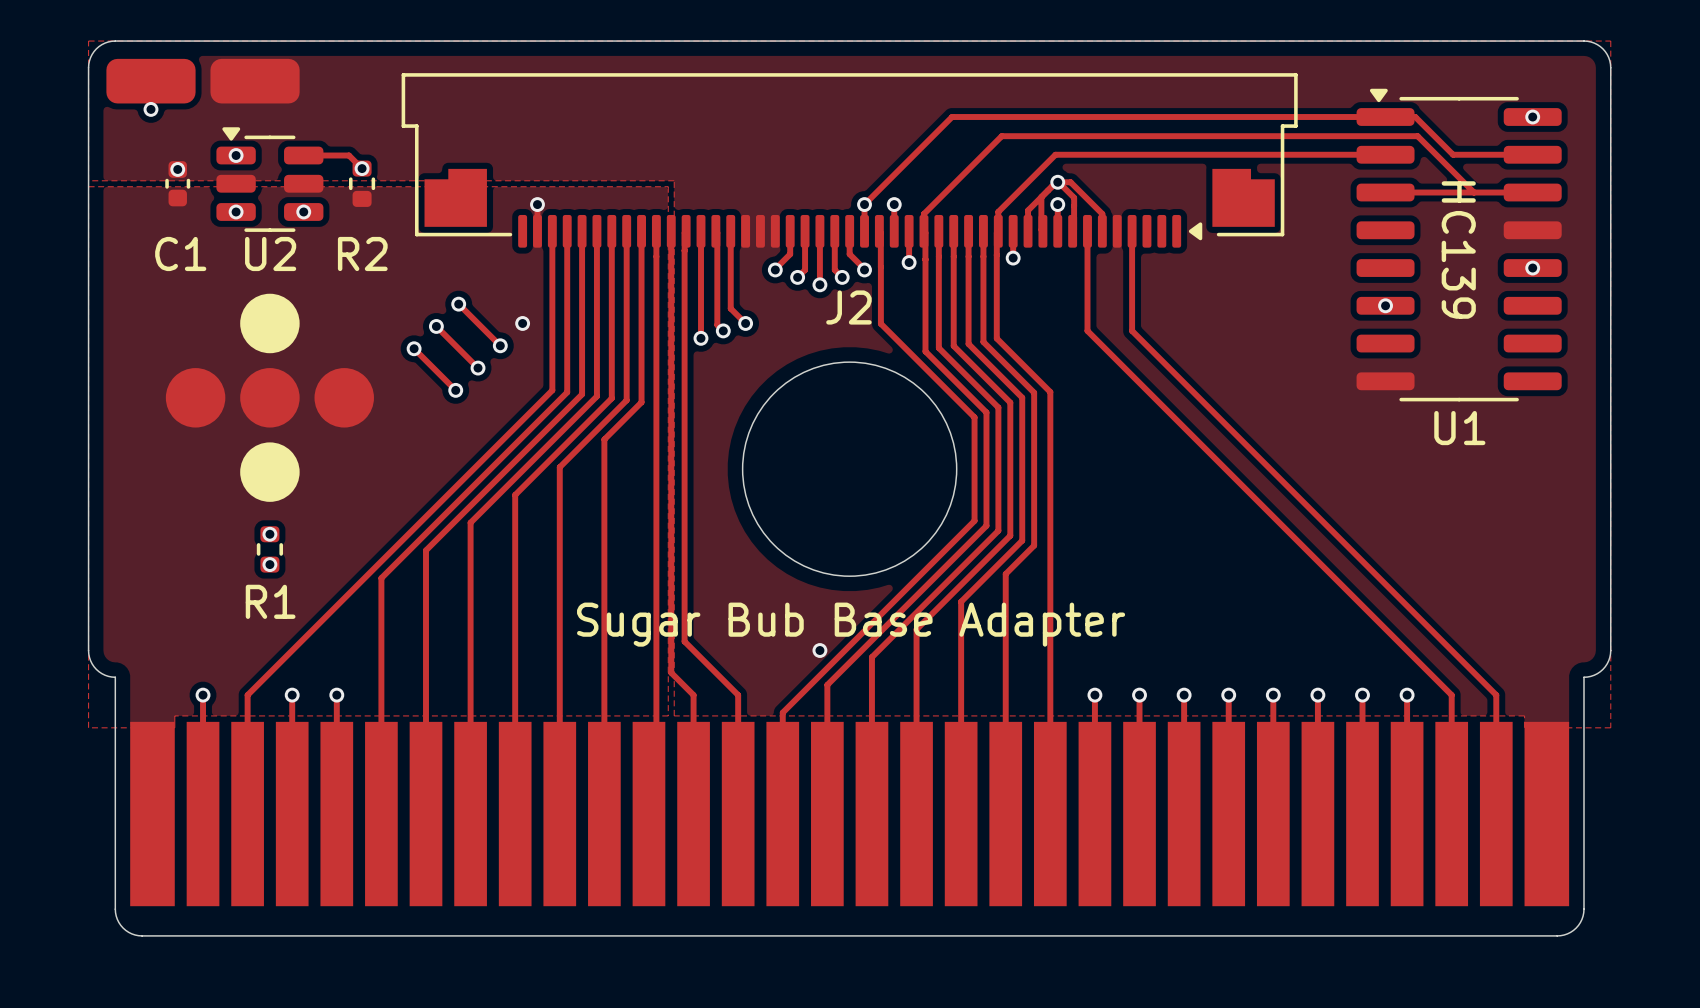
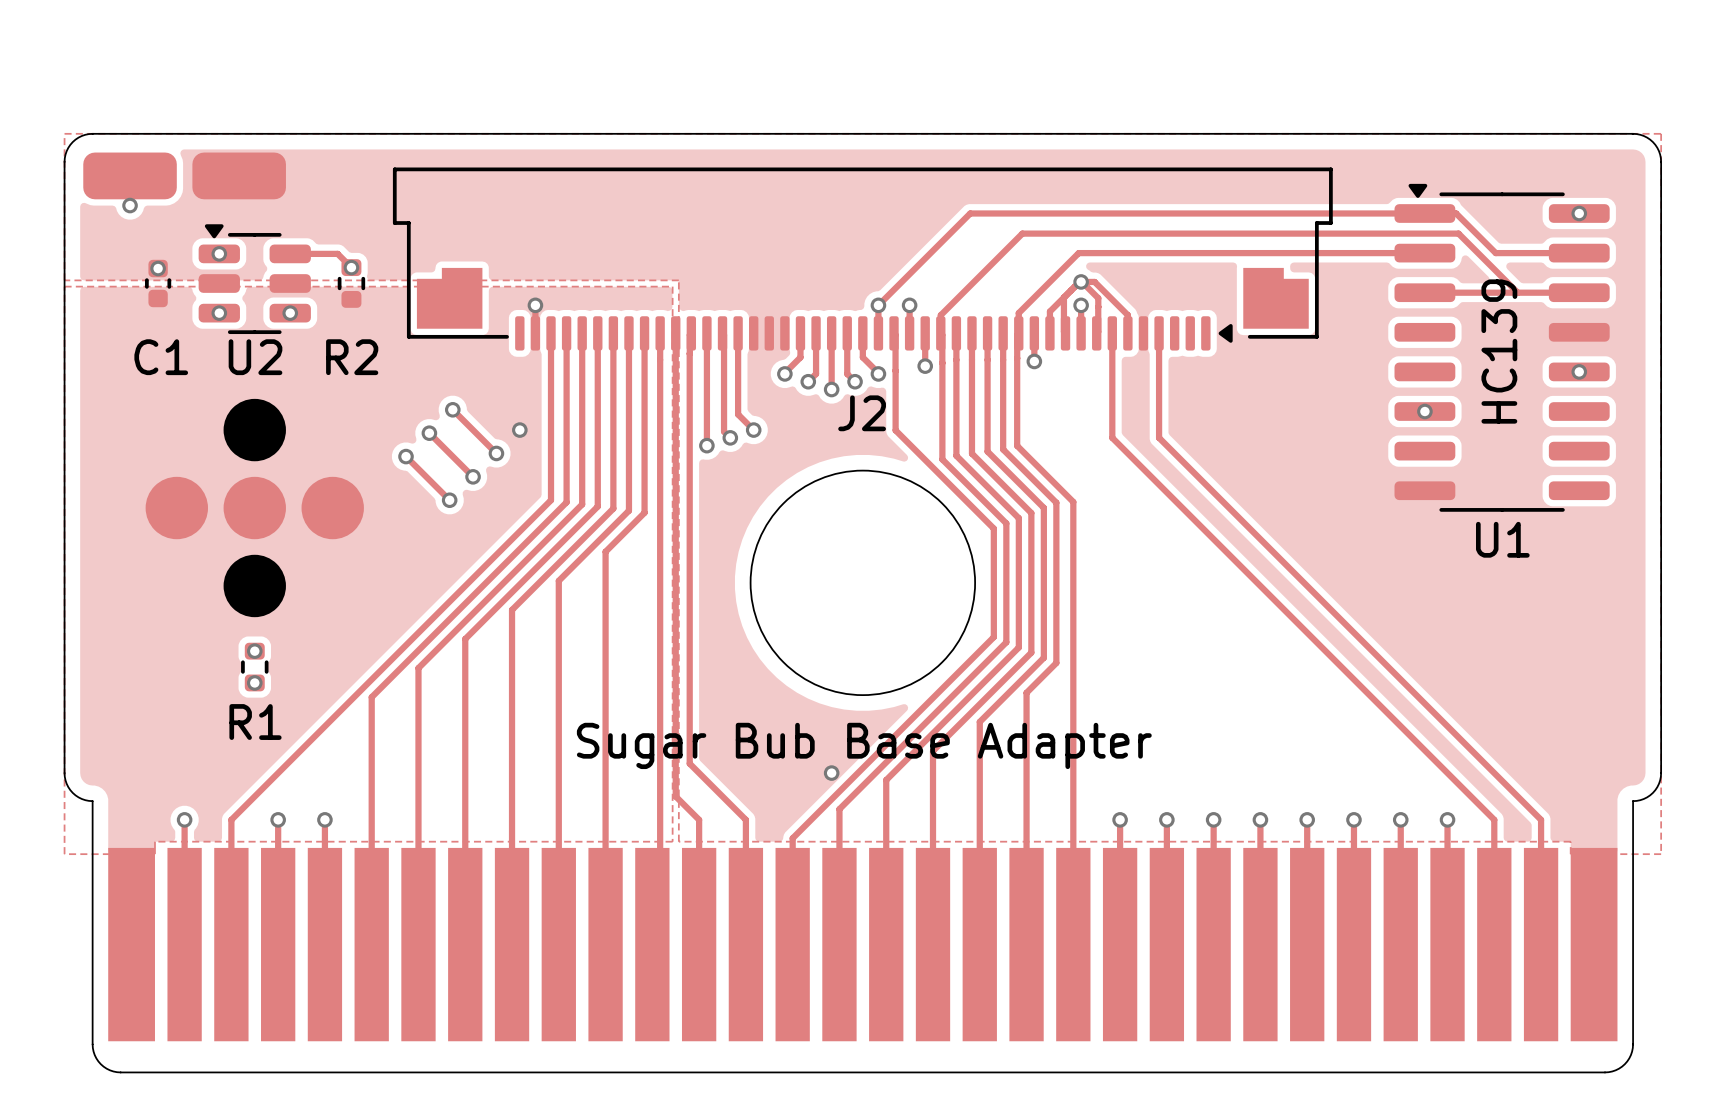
U1 value rotation: 0° (1458, 250) -> 180° (1499, 351)

